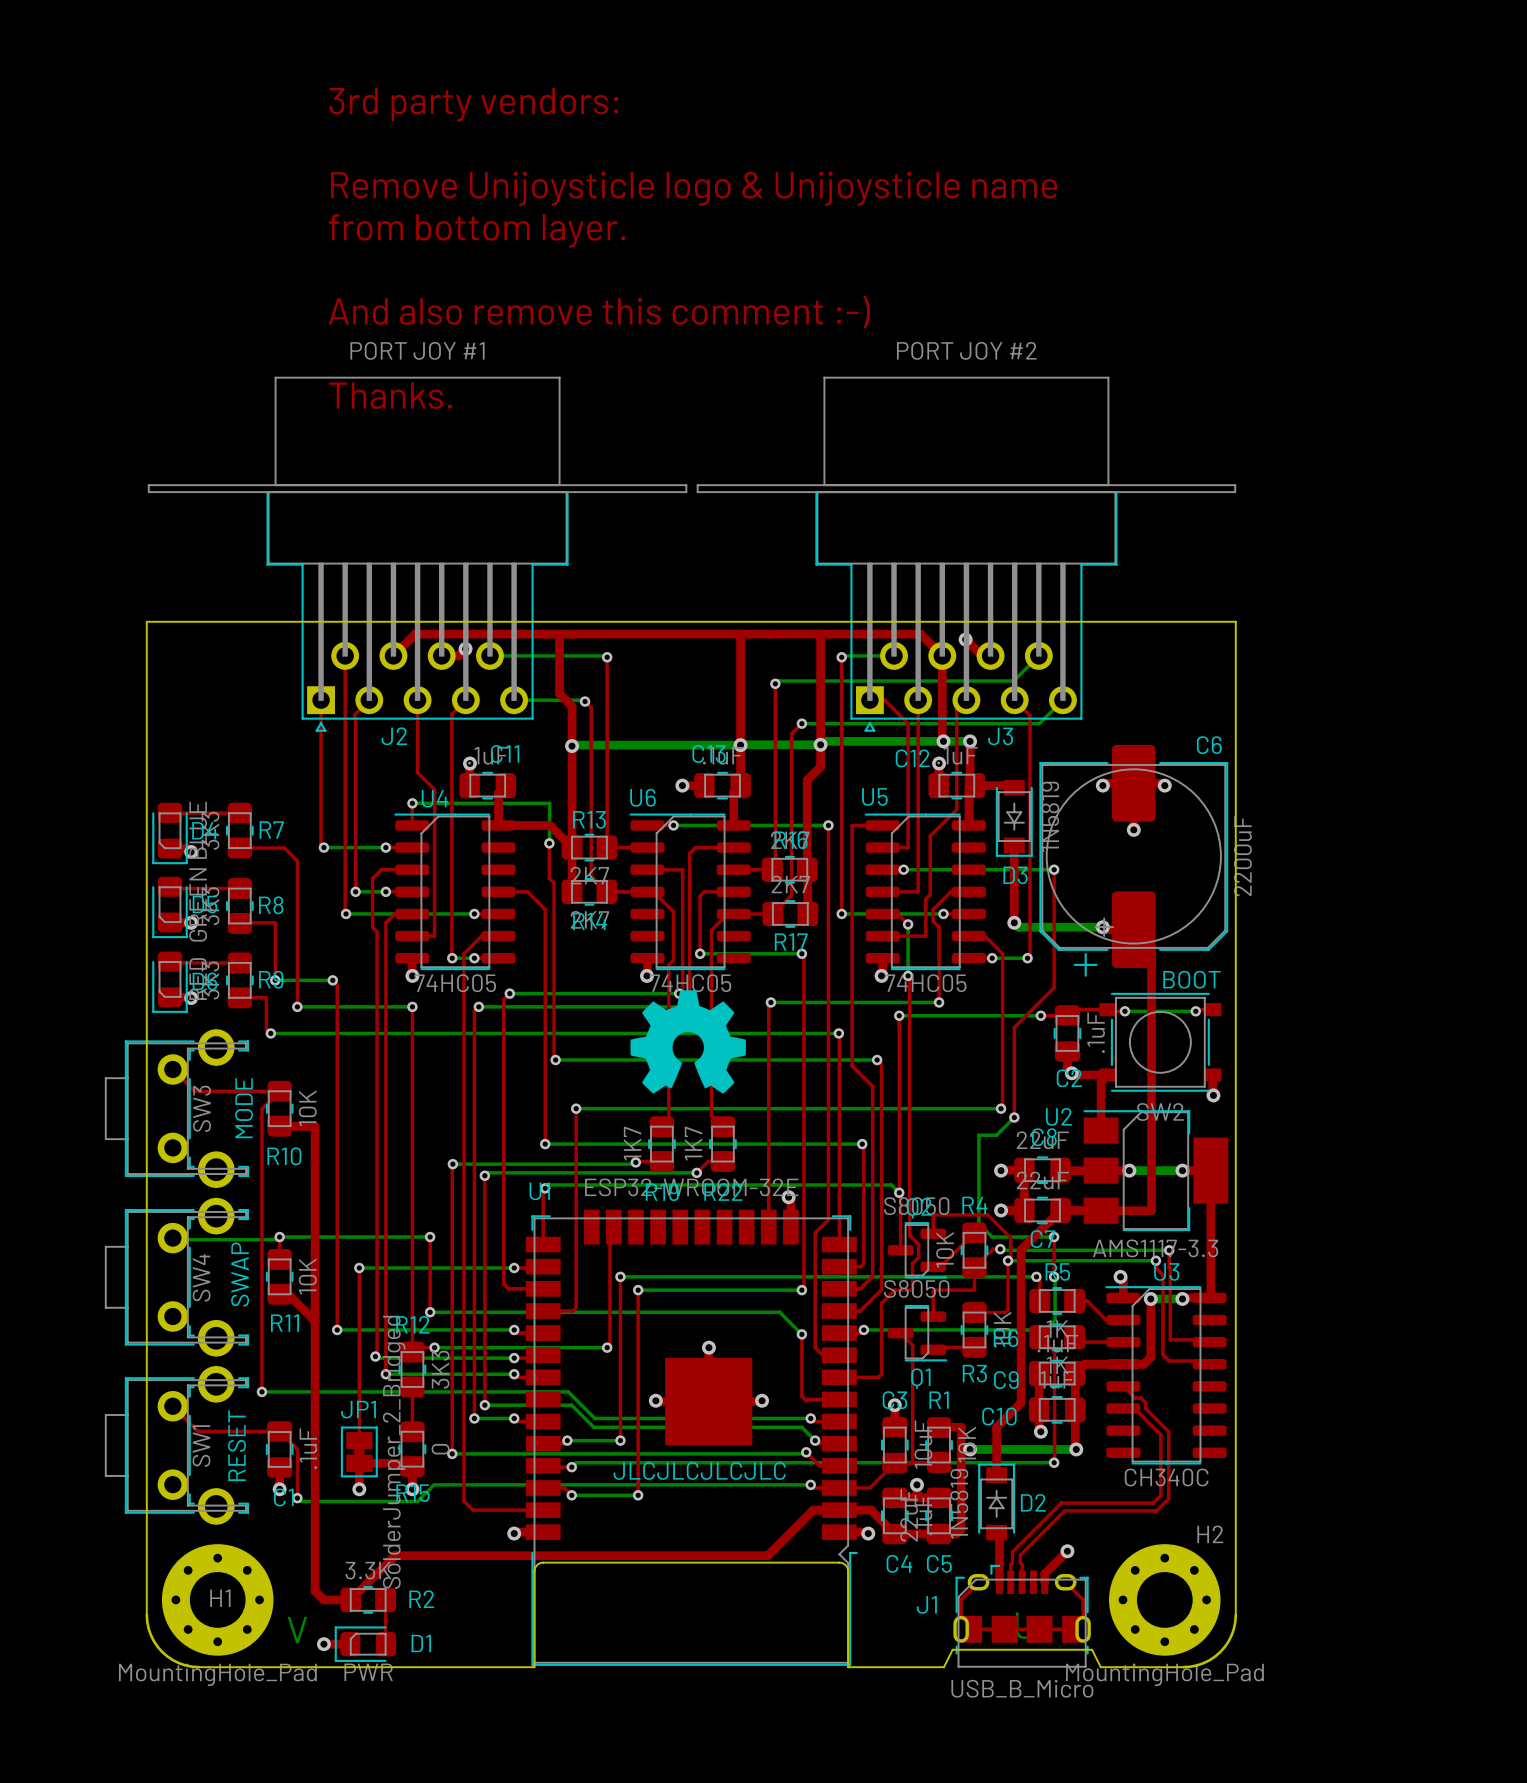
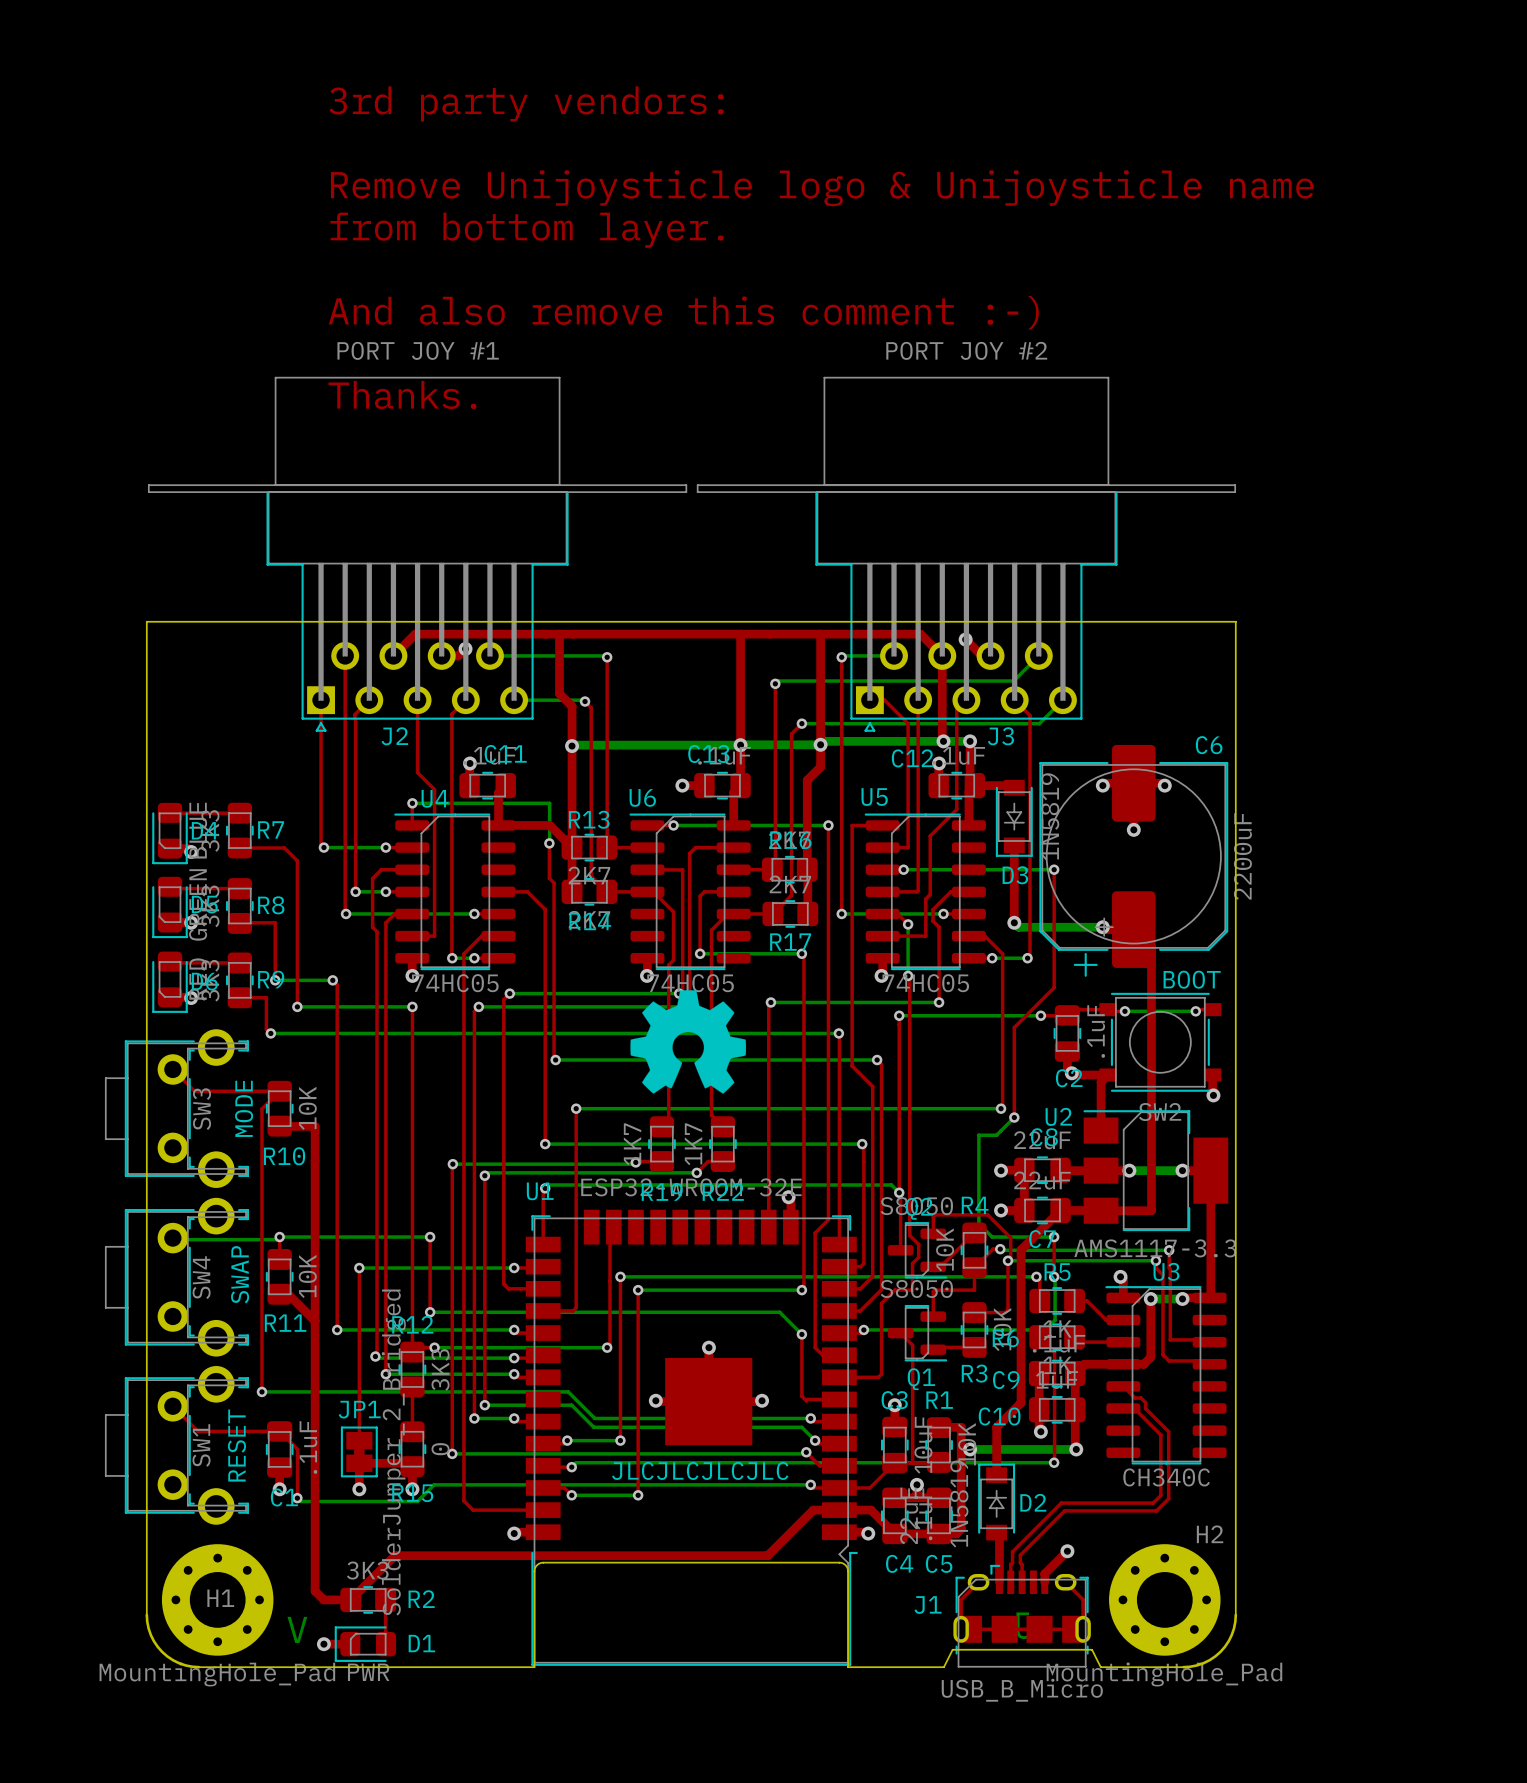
R2 value: 3.3K (368, 1570) -> 3K3 (367, 1570)

